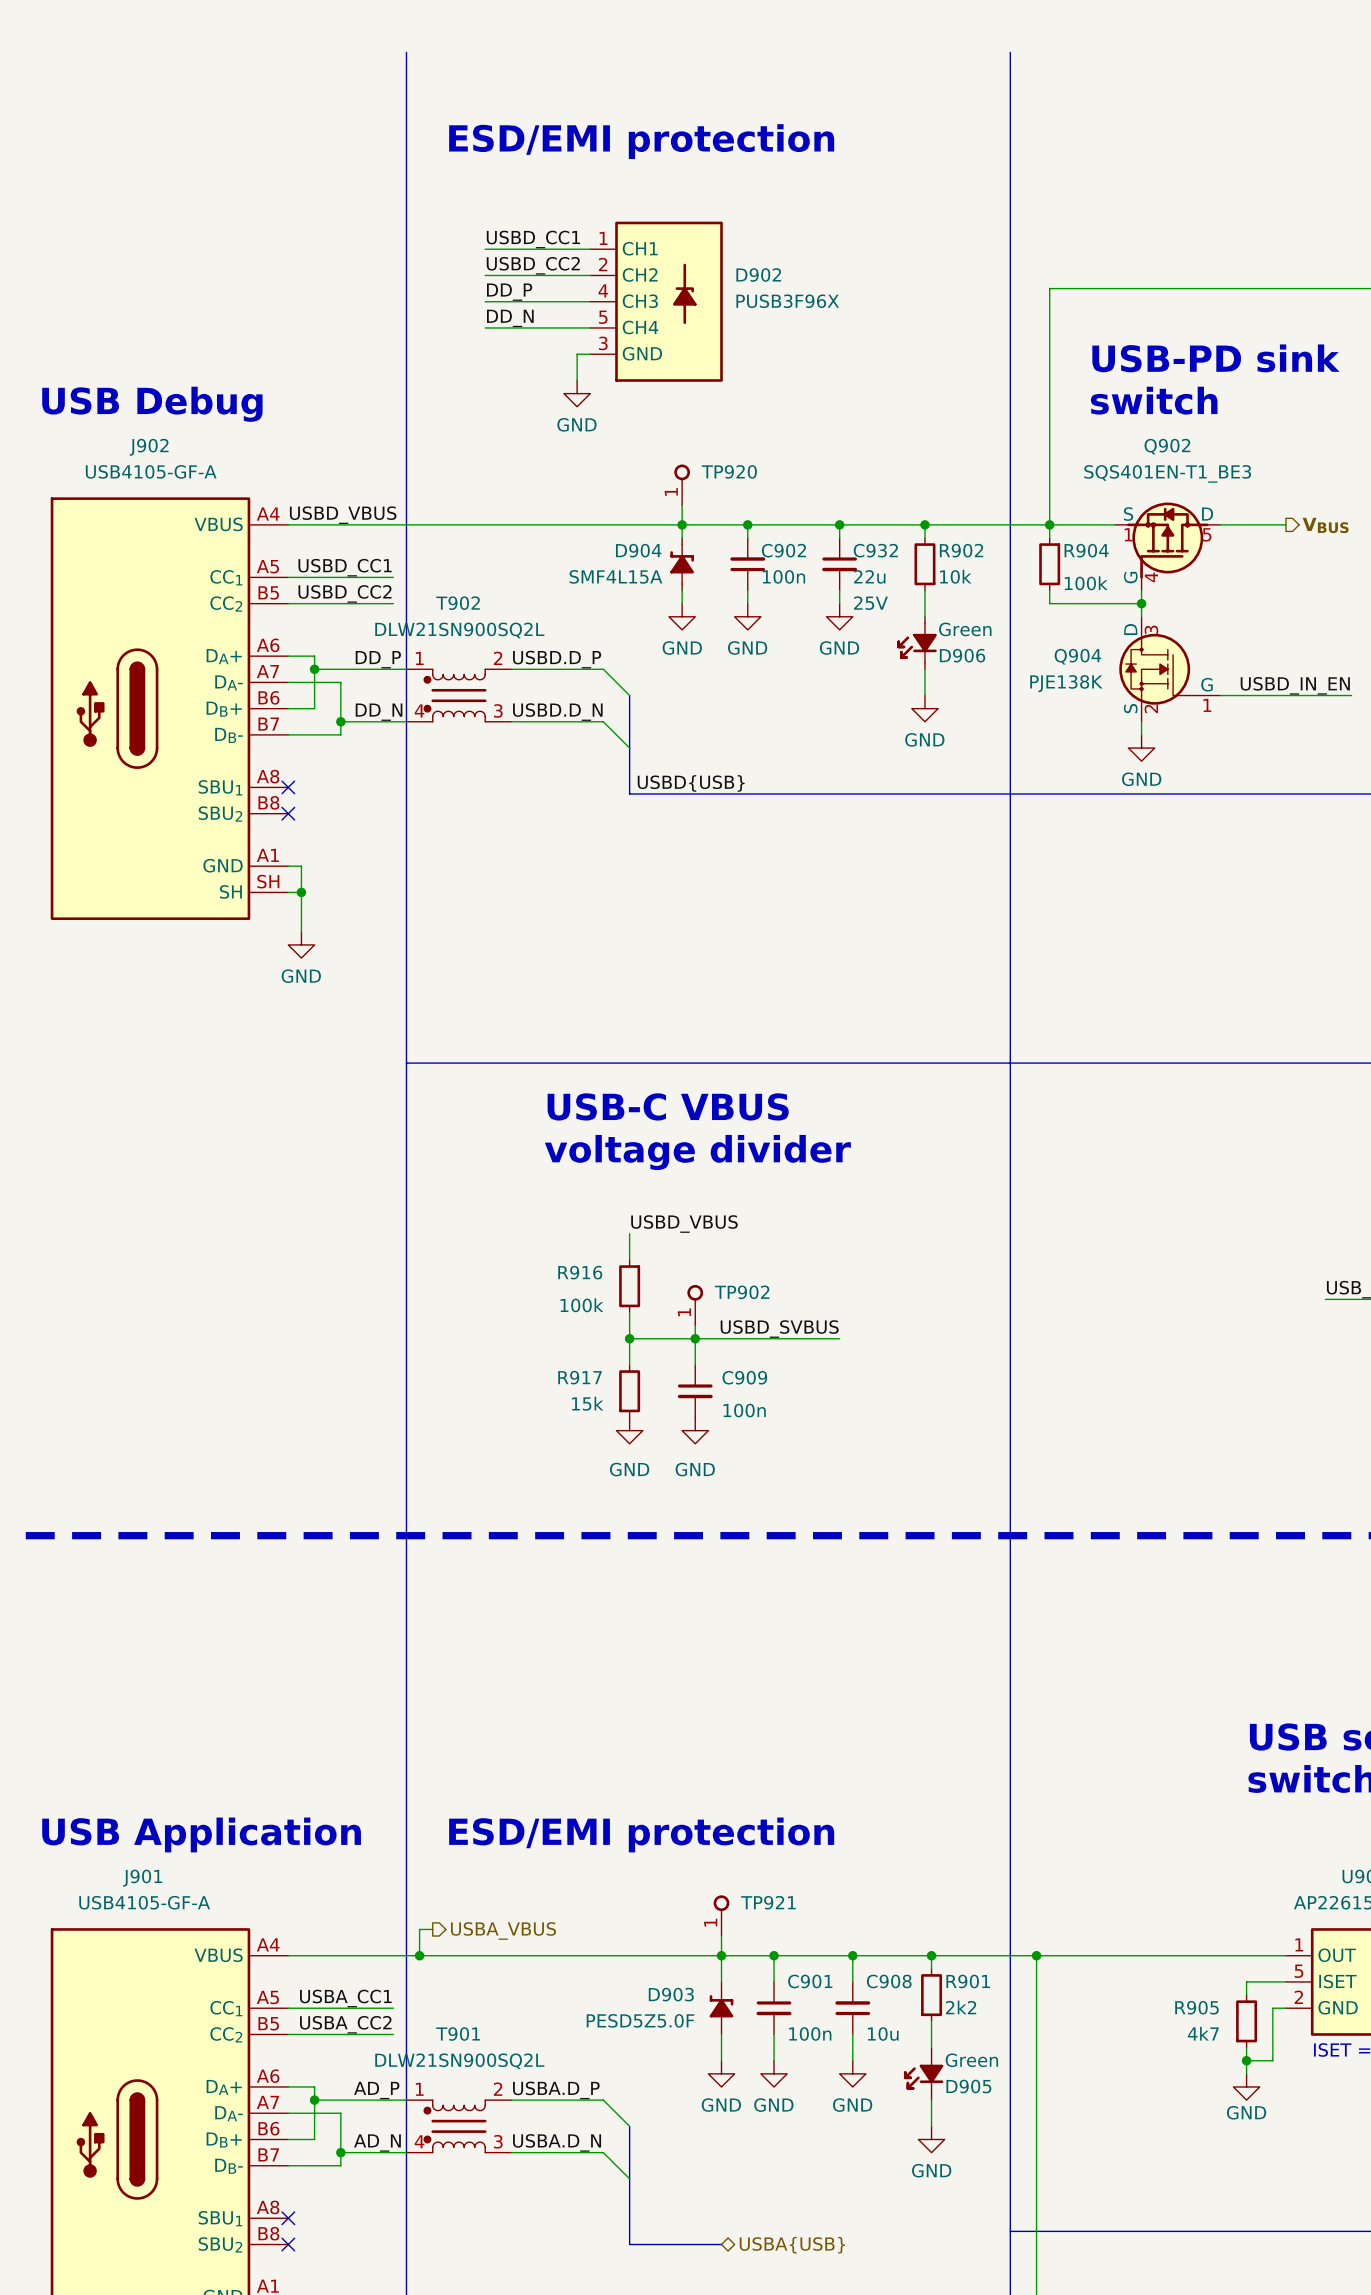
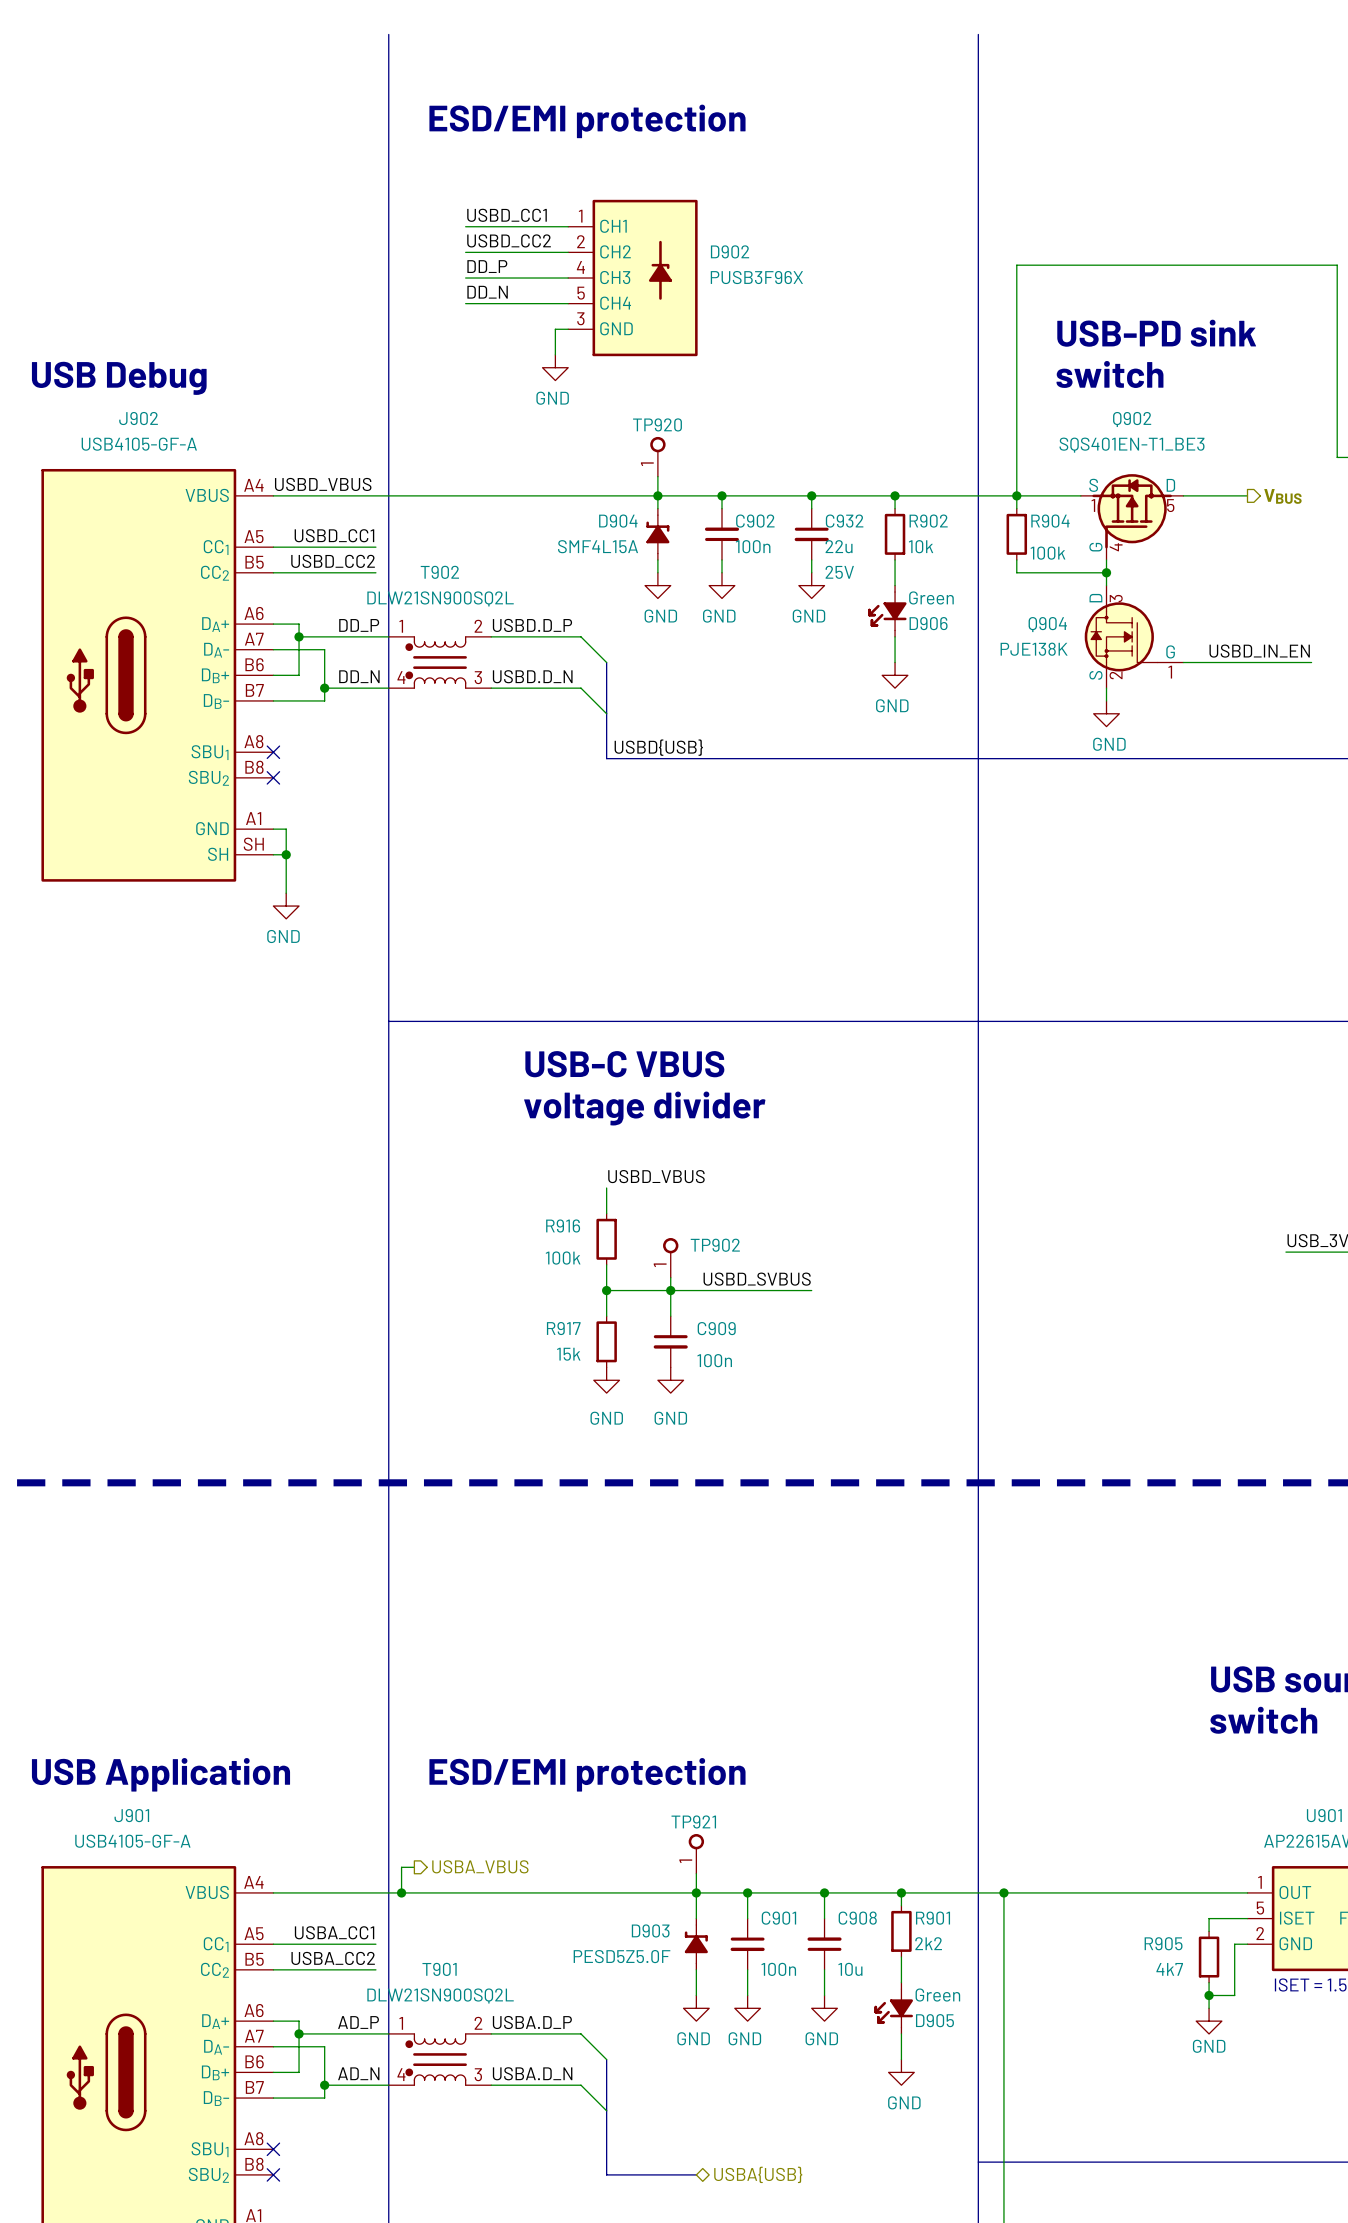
TP920 name position: TP920 (729, 471) -> TP920 (657, 424)
TP921 name position: TP921 (768, 1902) -> TP921 (693, 1821)

